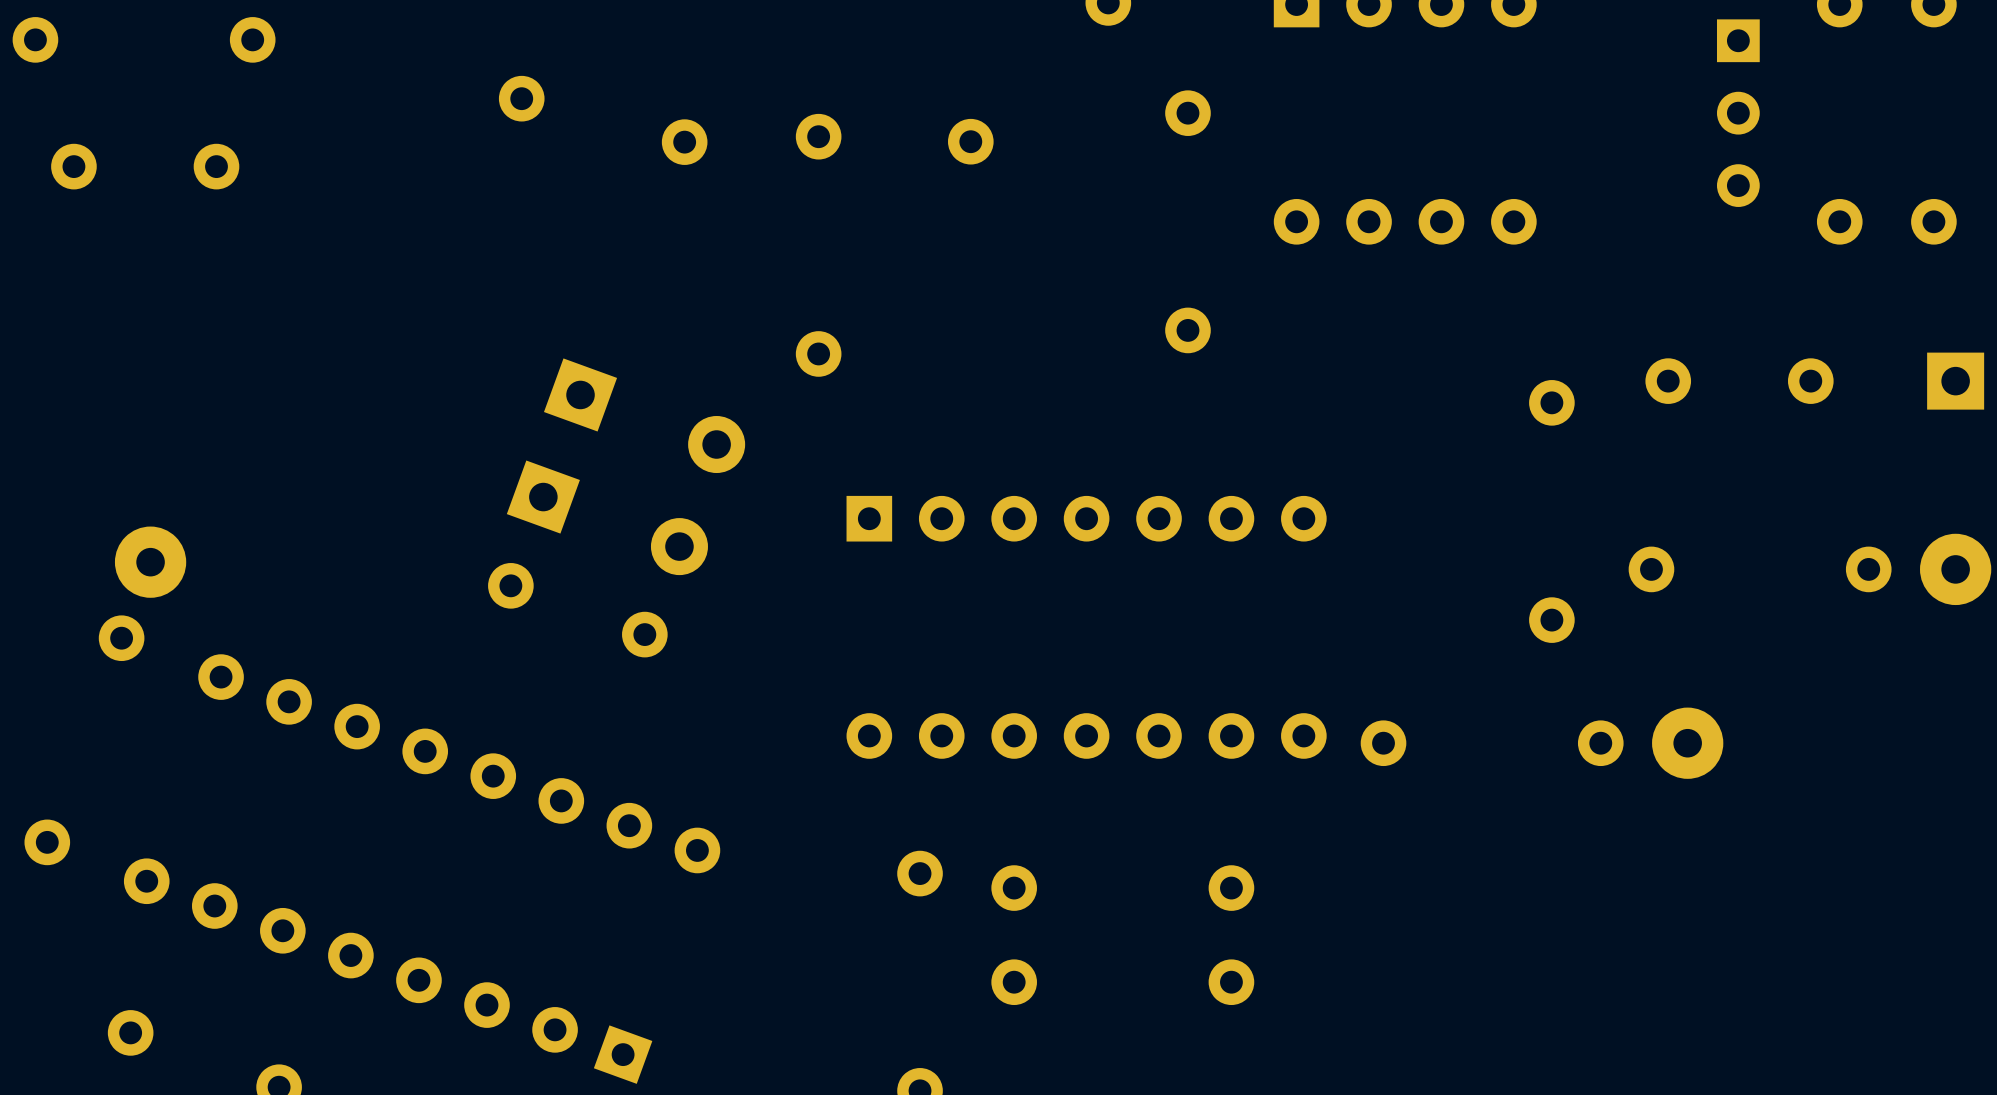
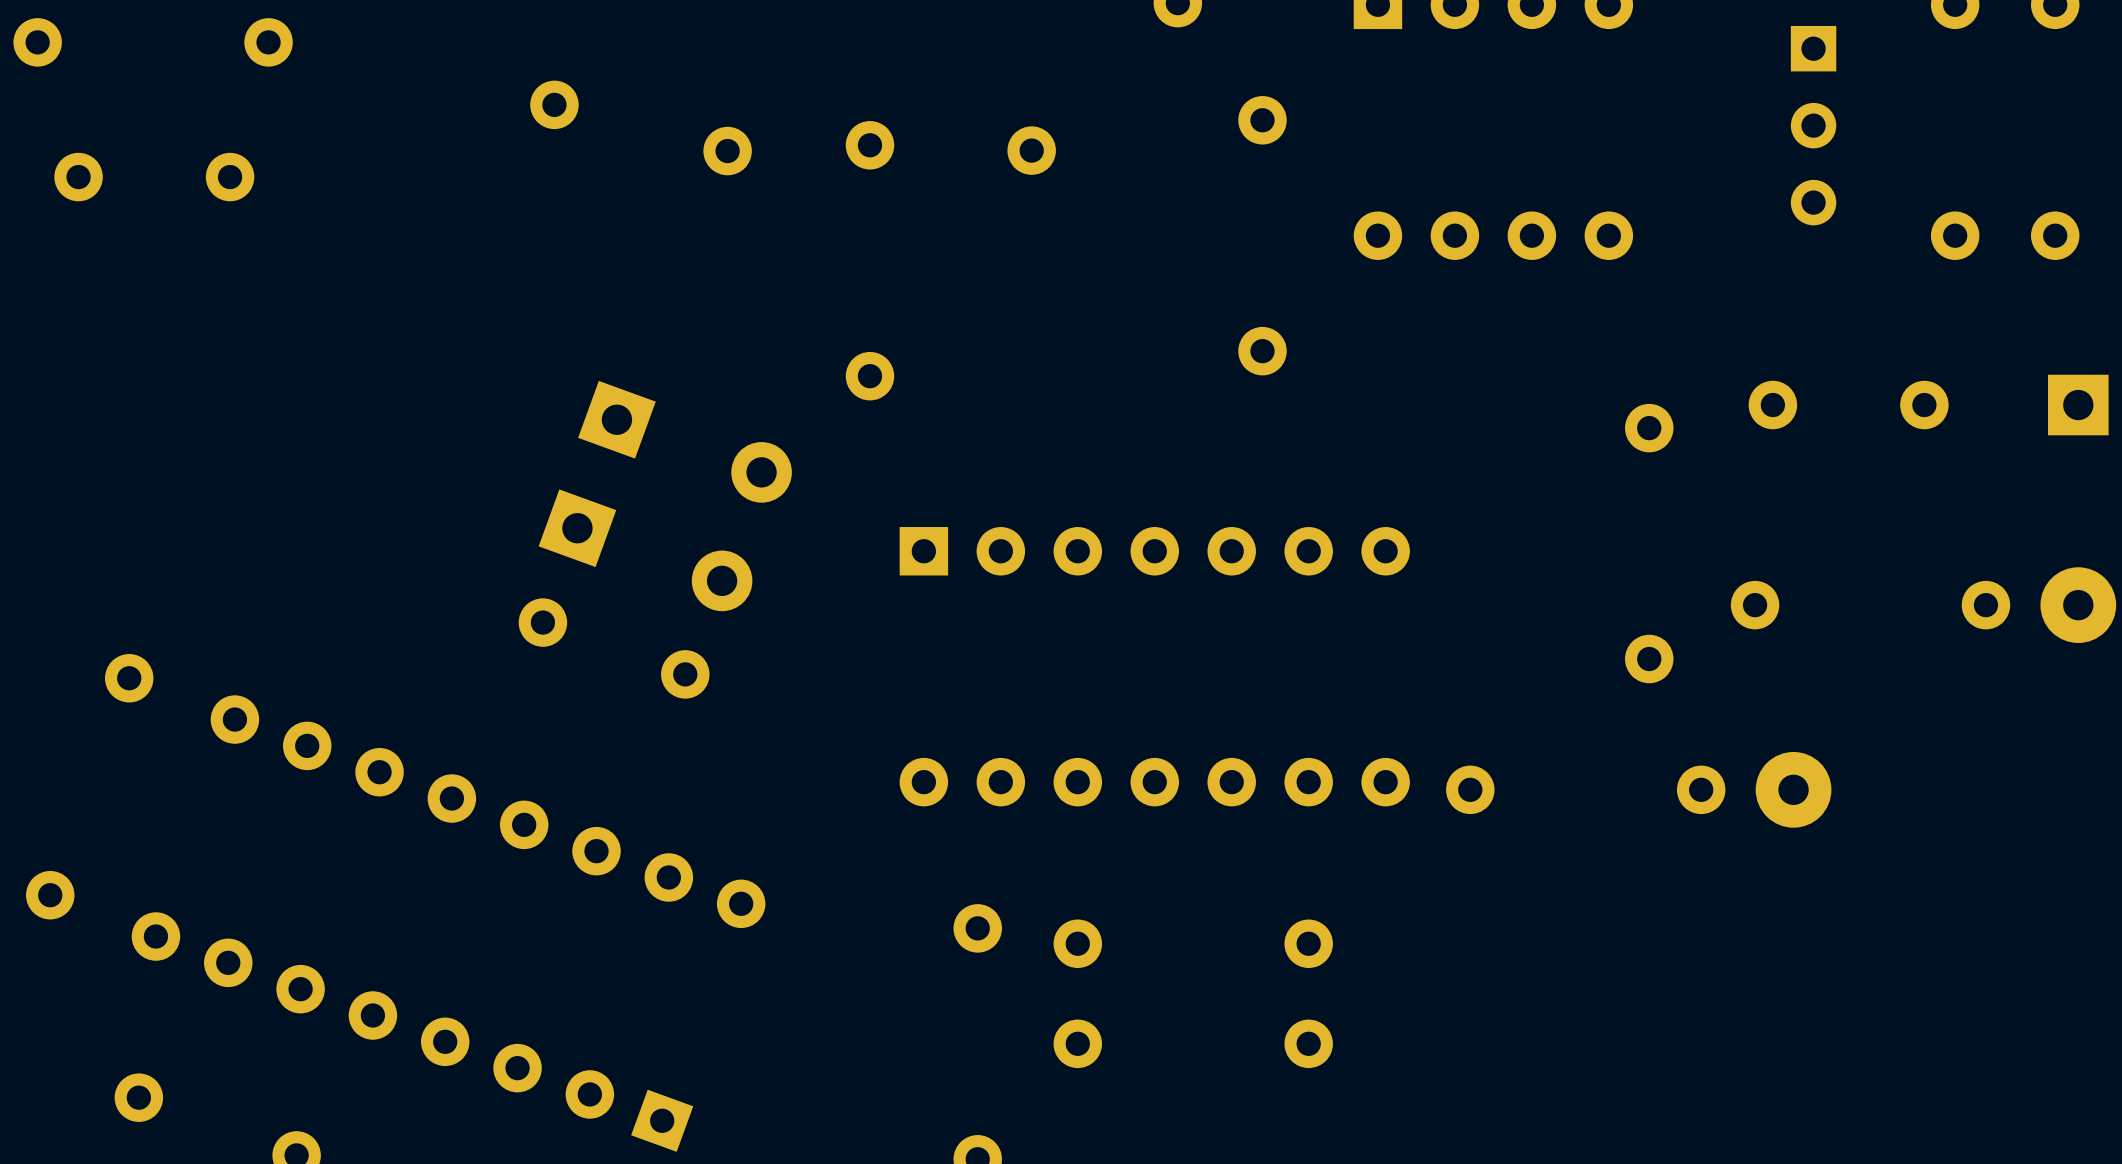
part position: (1738, 113) -> (1813, 125)
part: (150, 562) -> none

